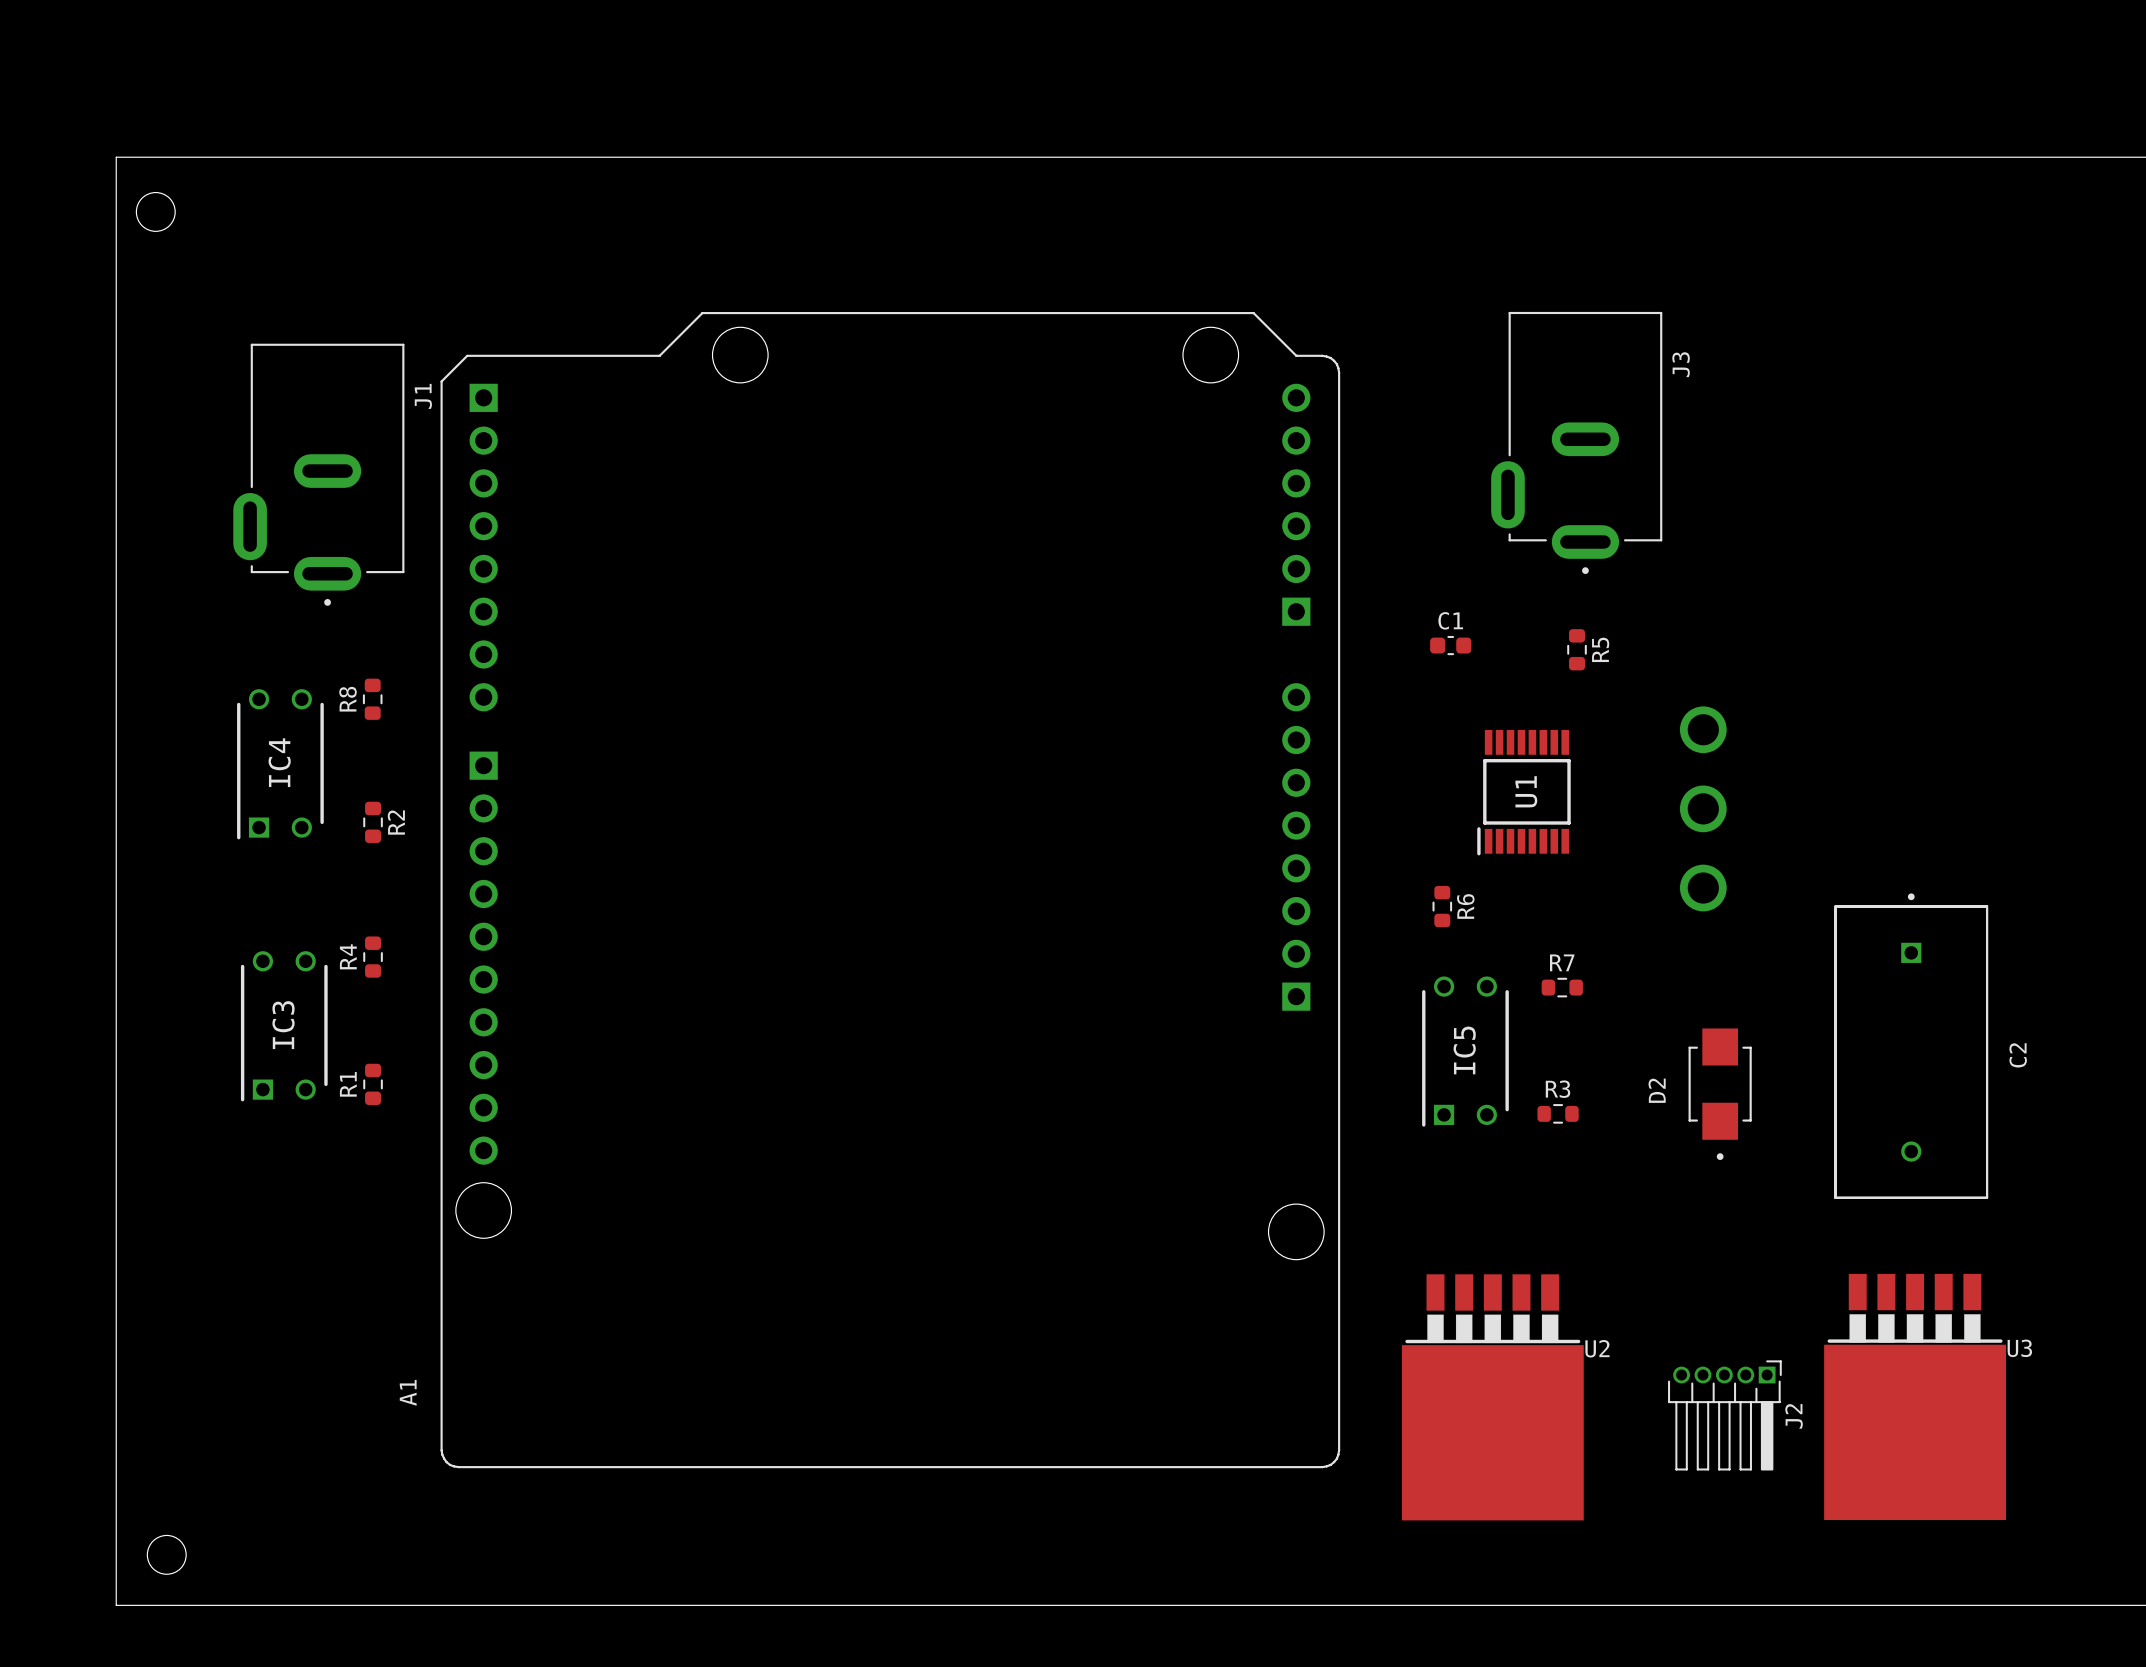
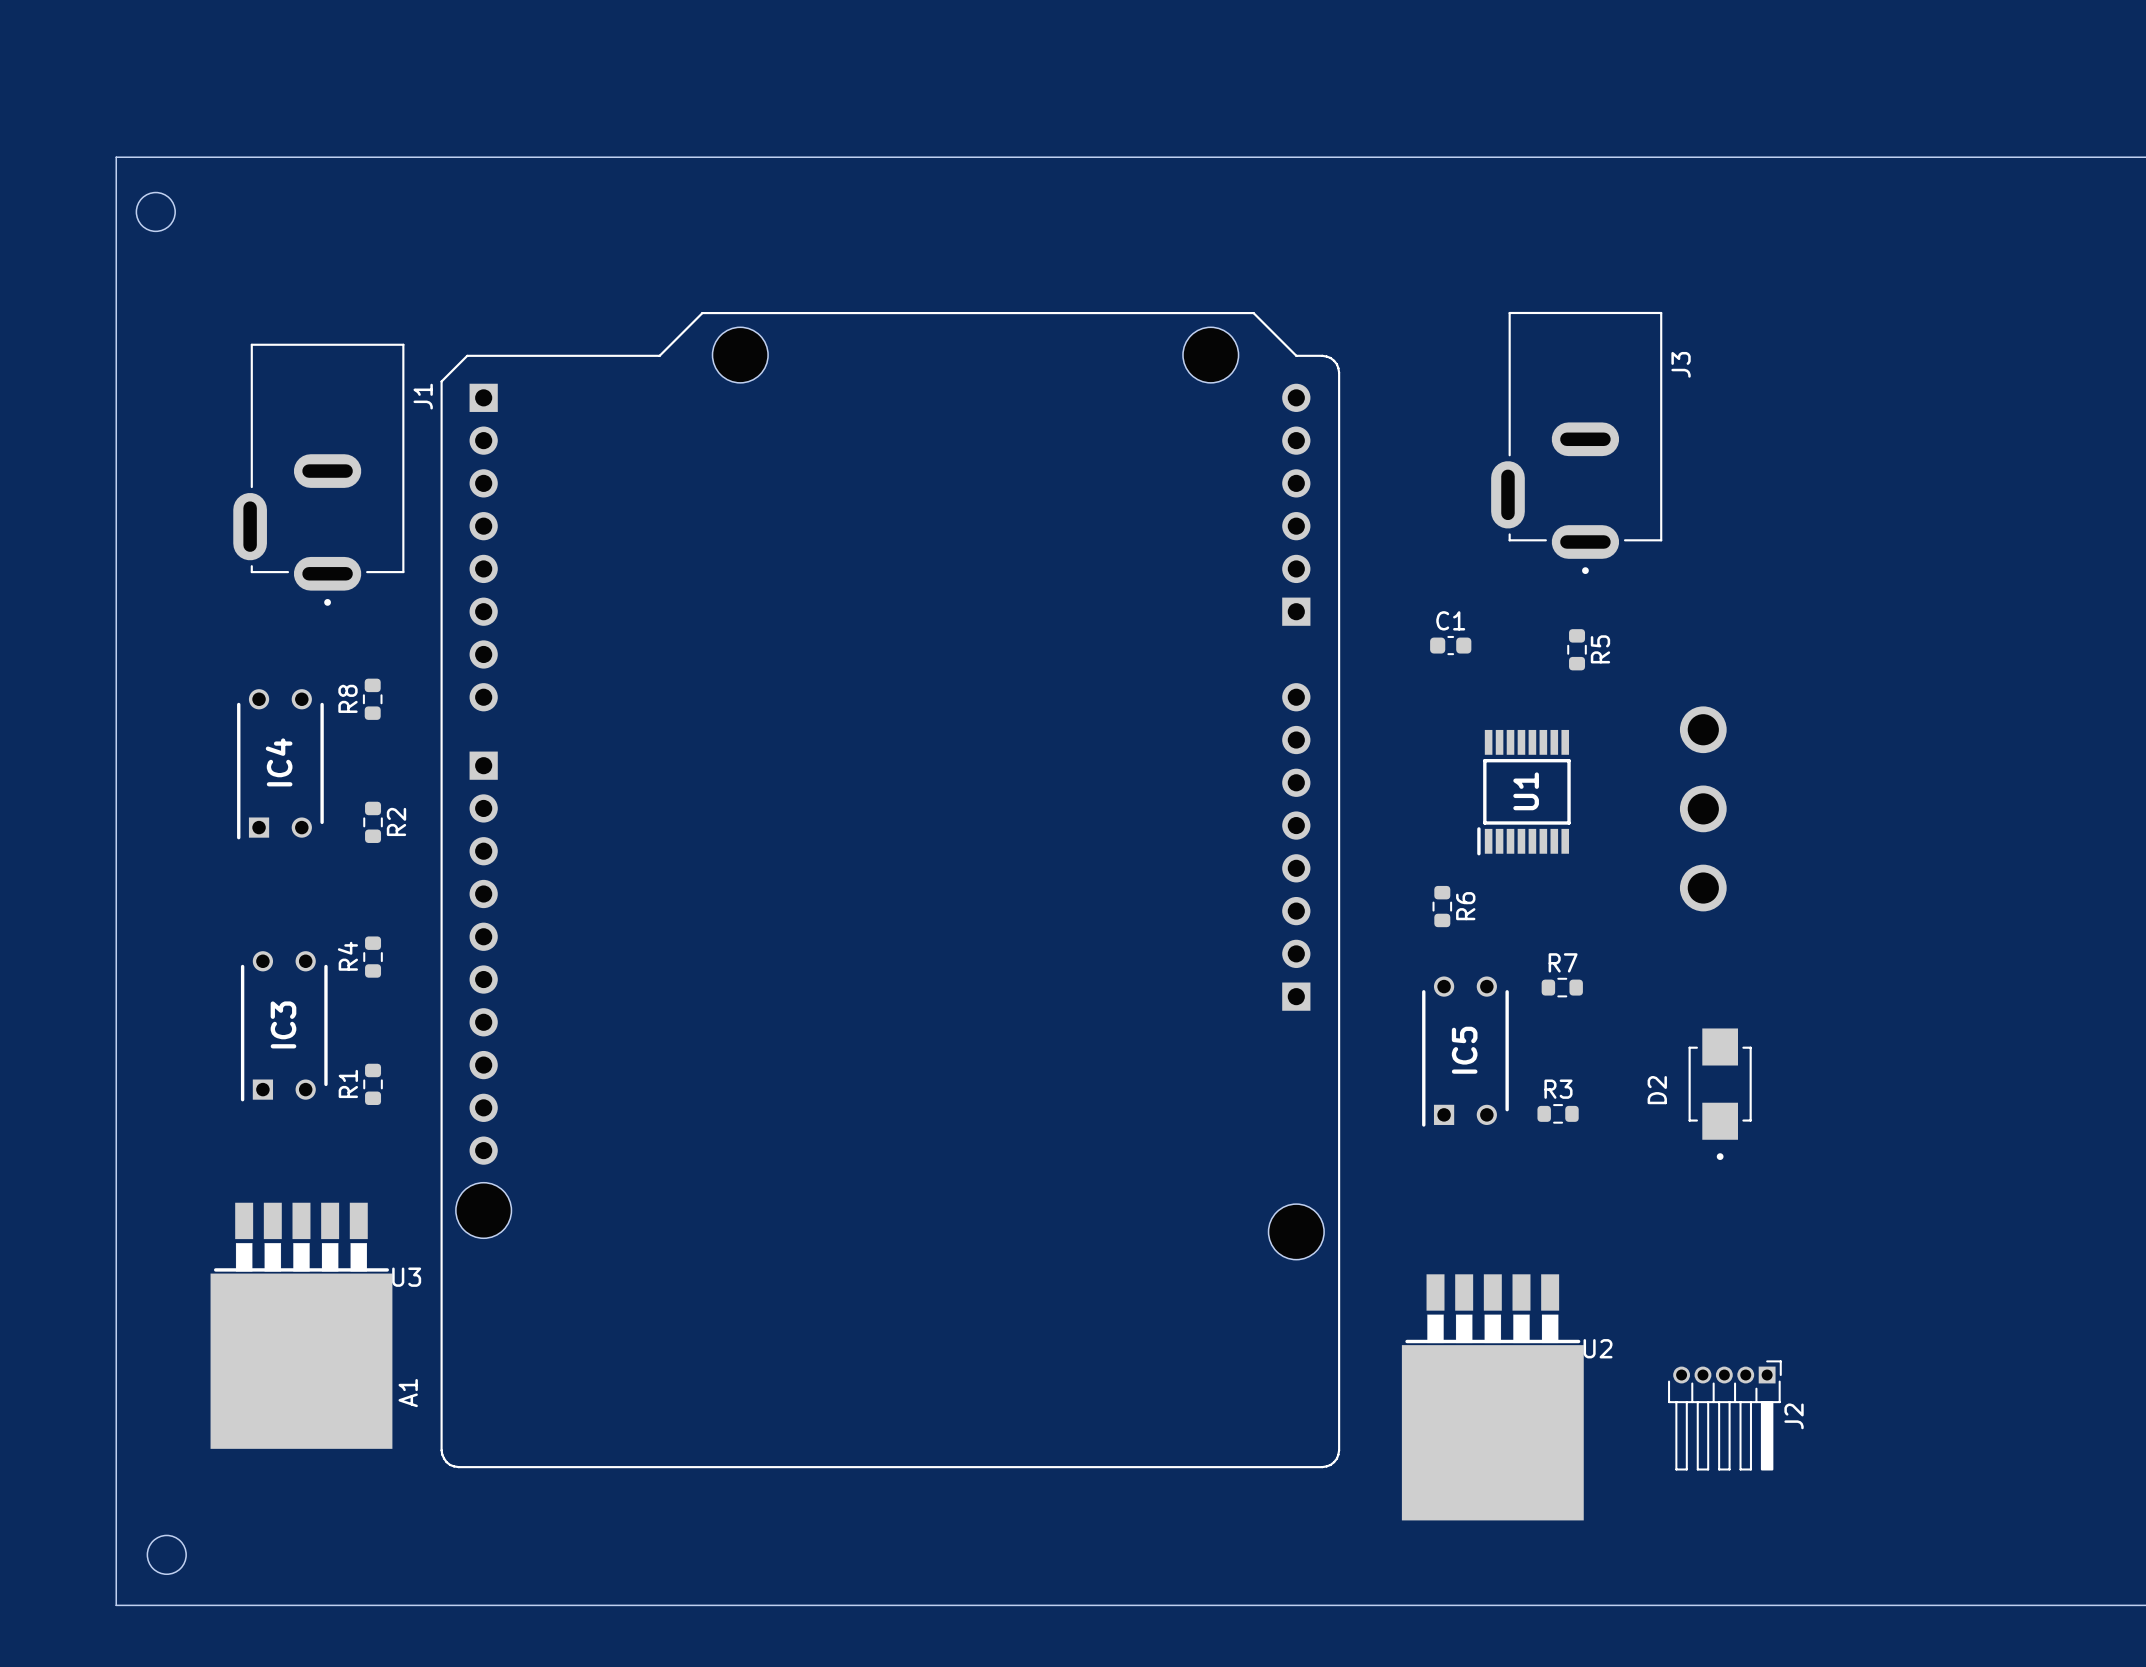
C2: (1911, 1046) -> none
U3 position: (1915, 1396) -> (301, 1325)

